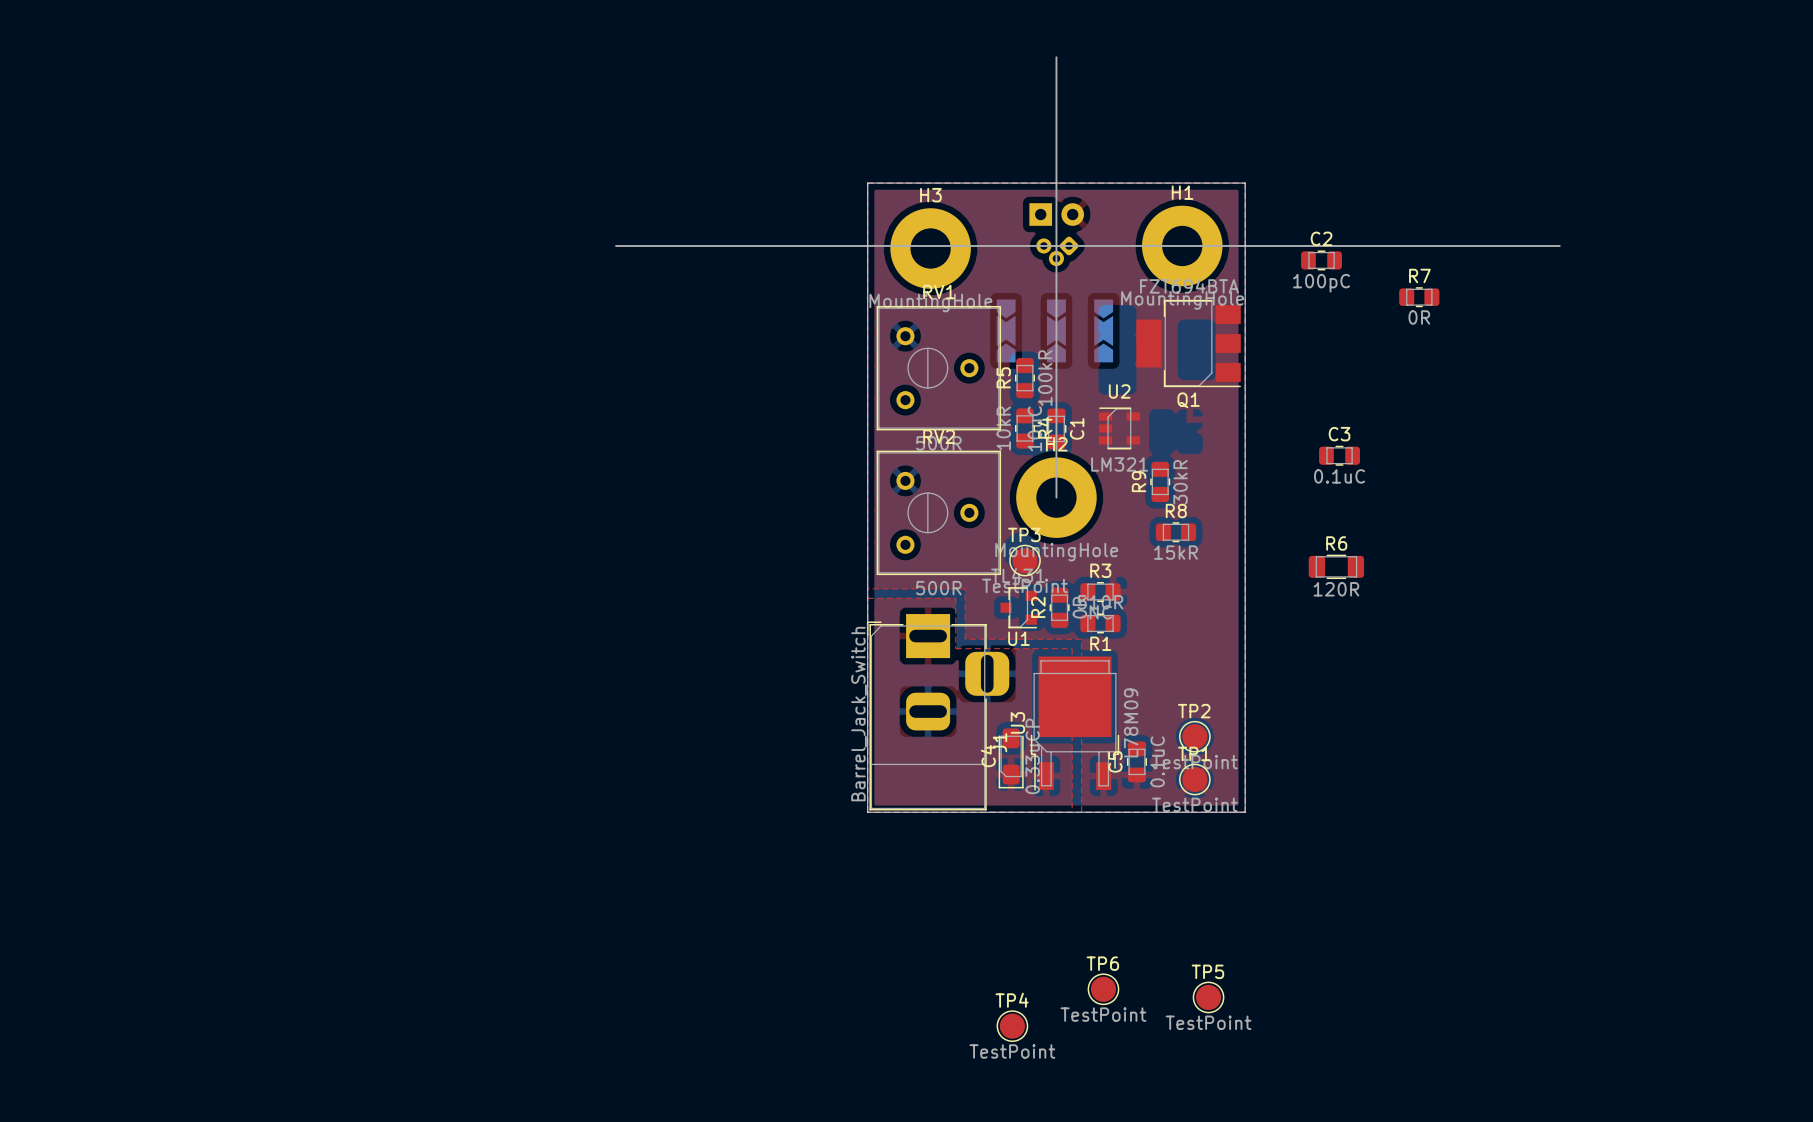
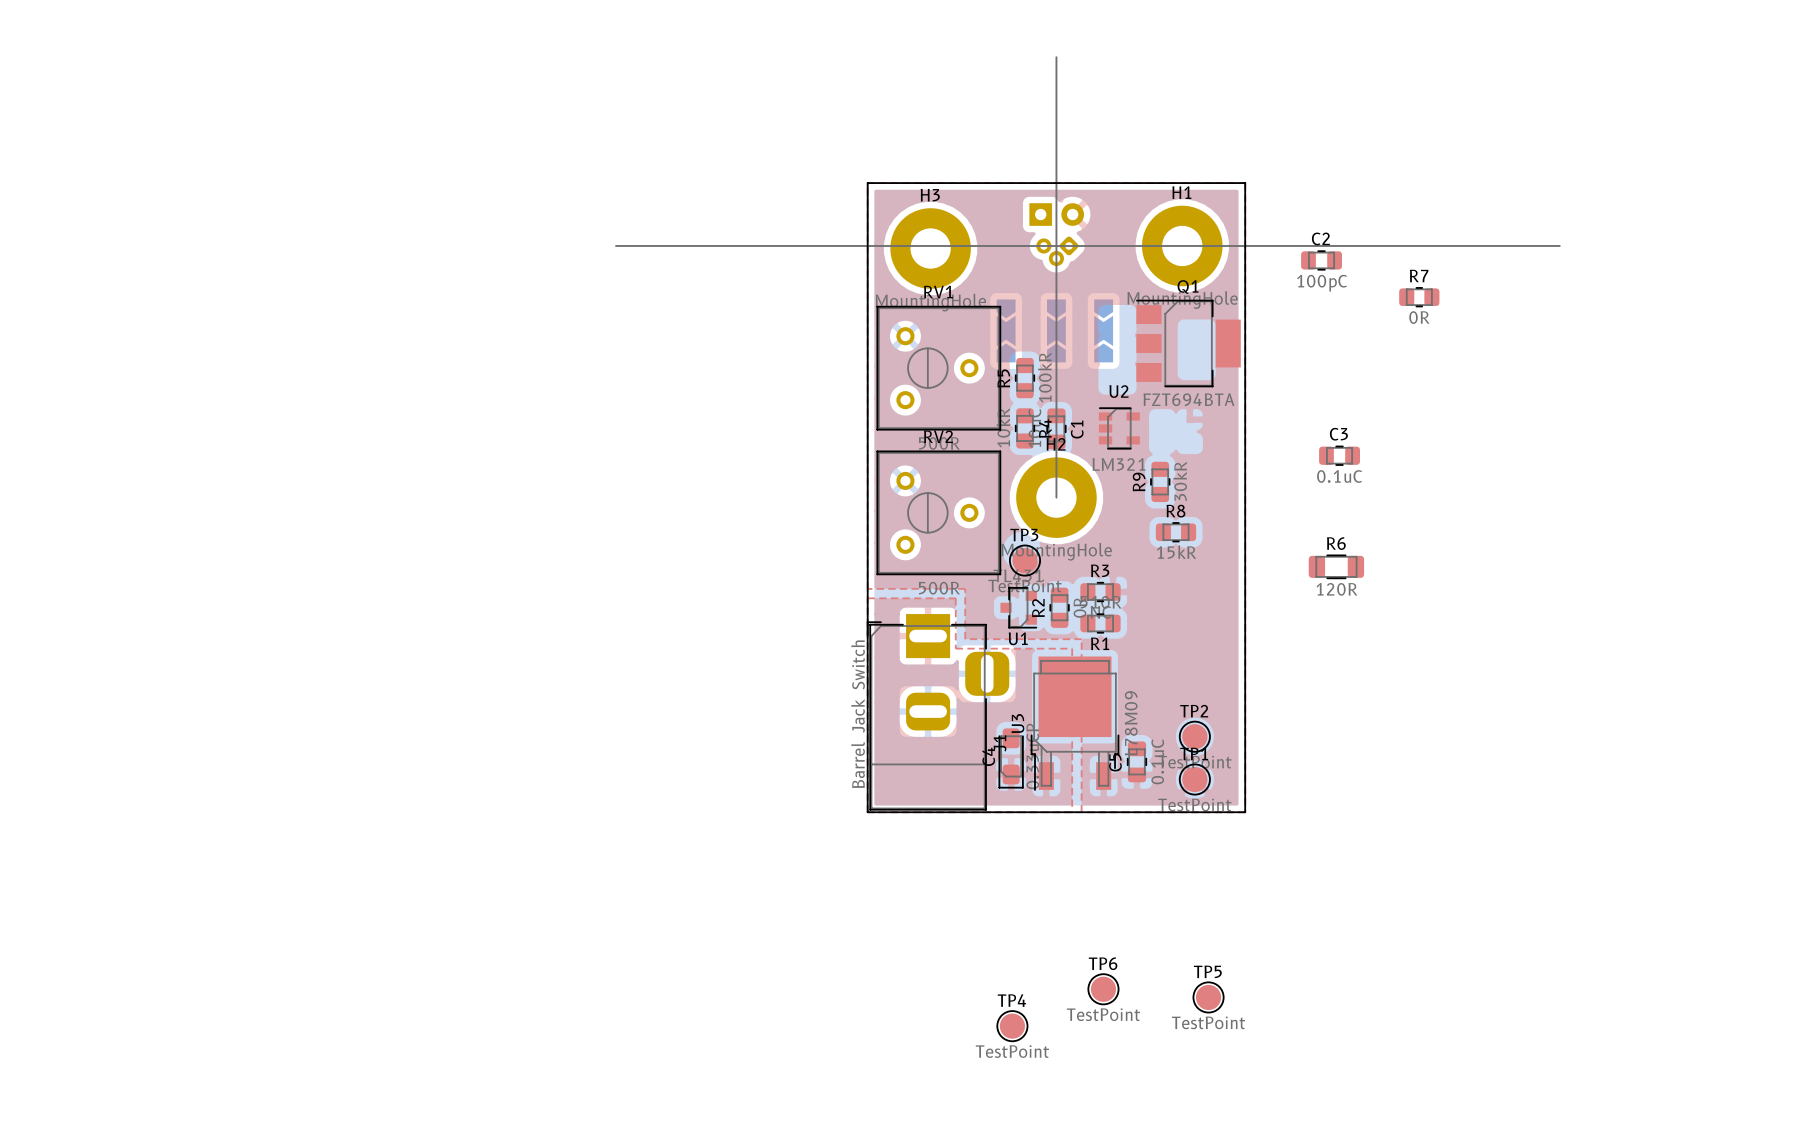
Q1 rotation: 0° (1188, 343) -> 180° (1188, 343)

